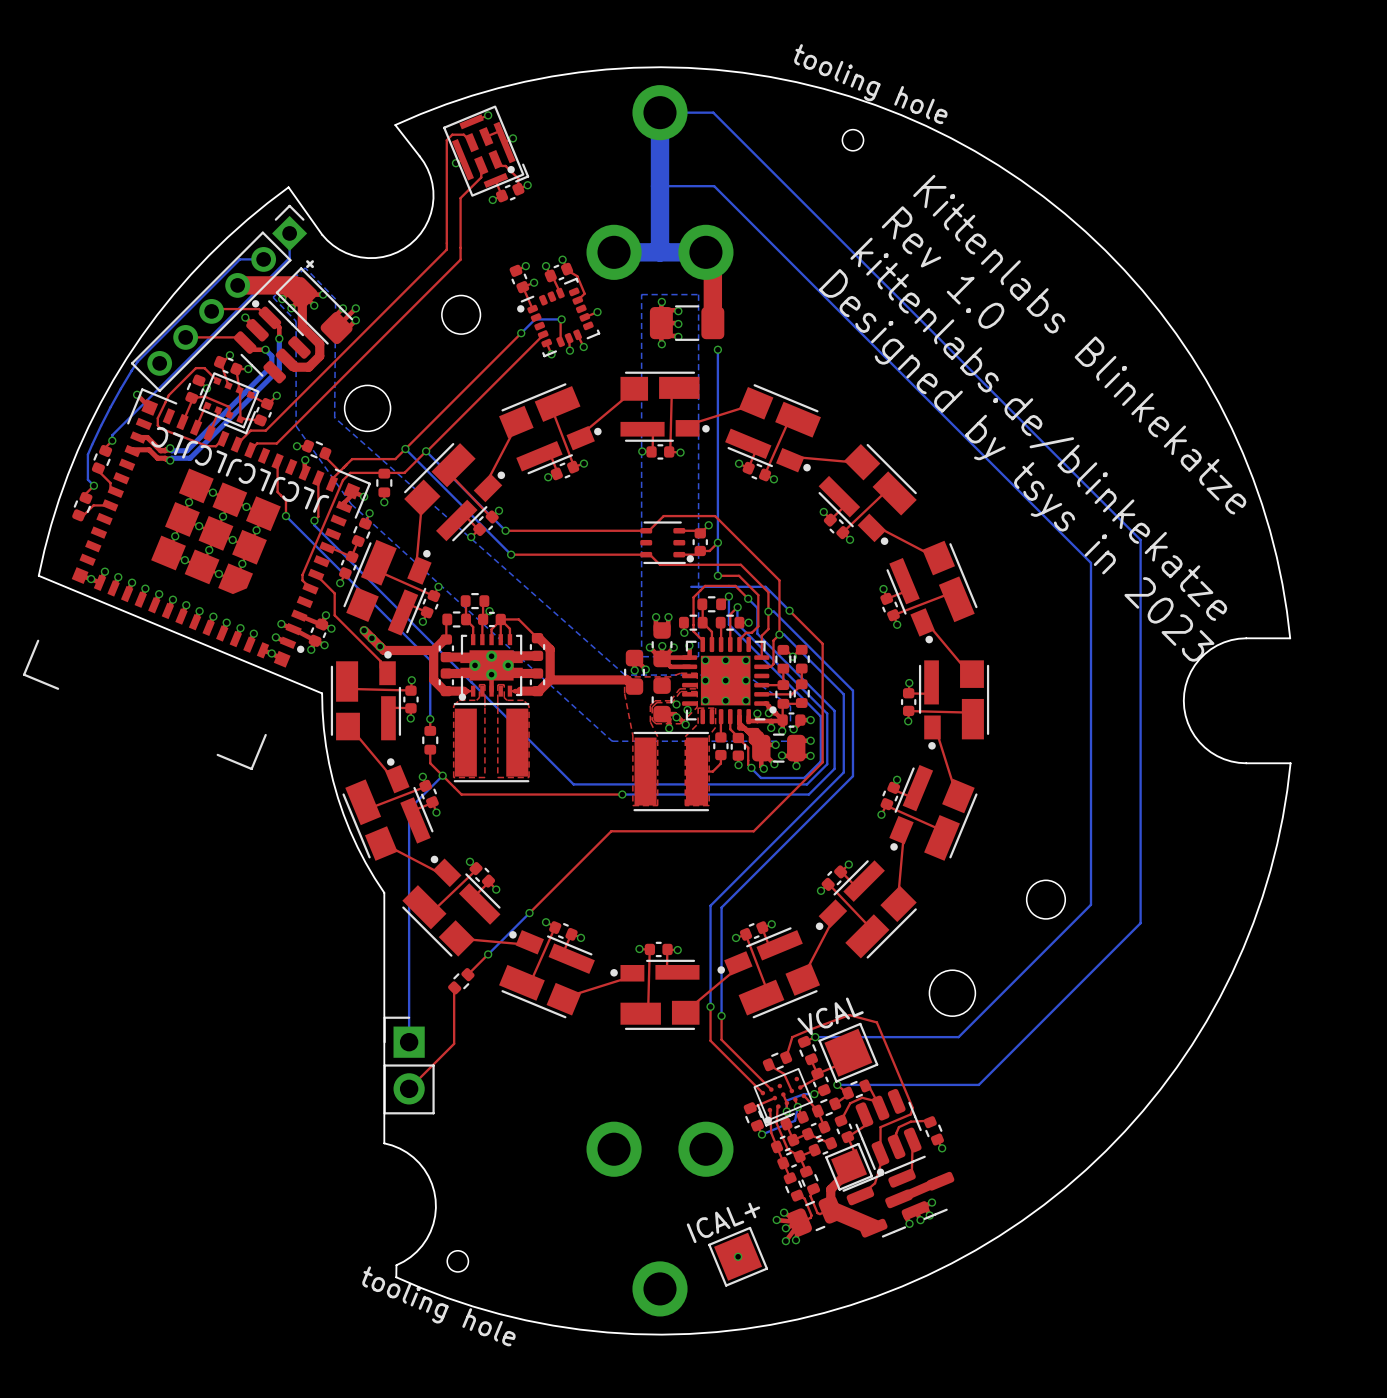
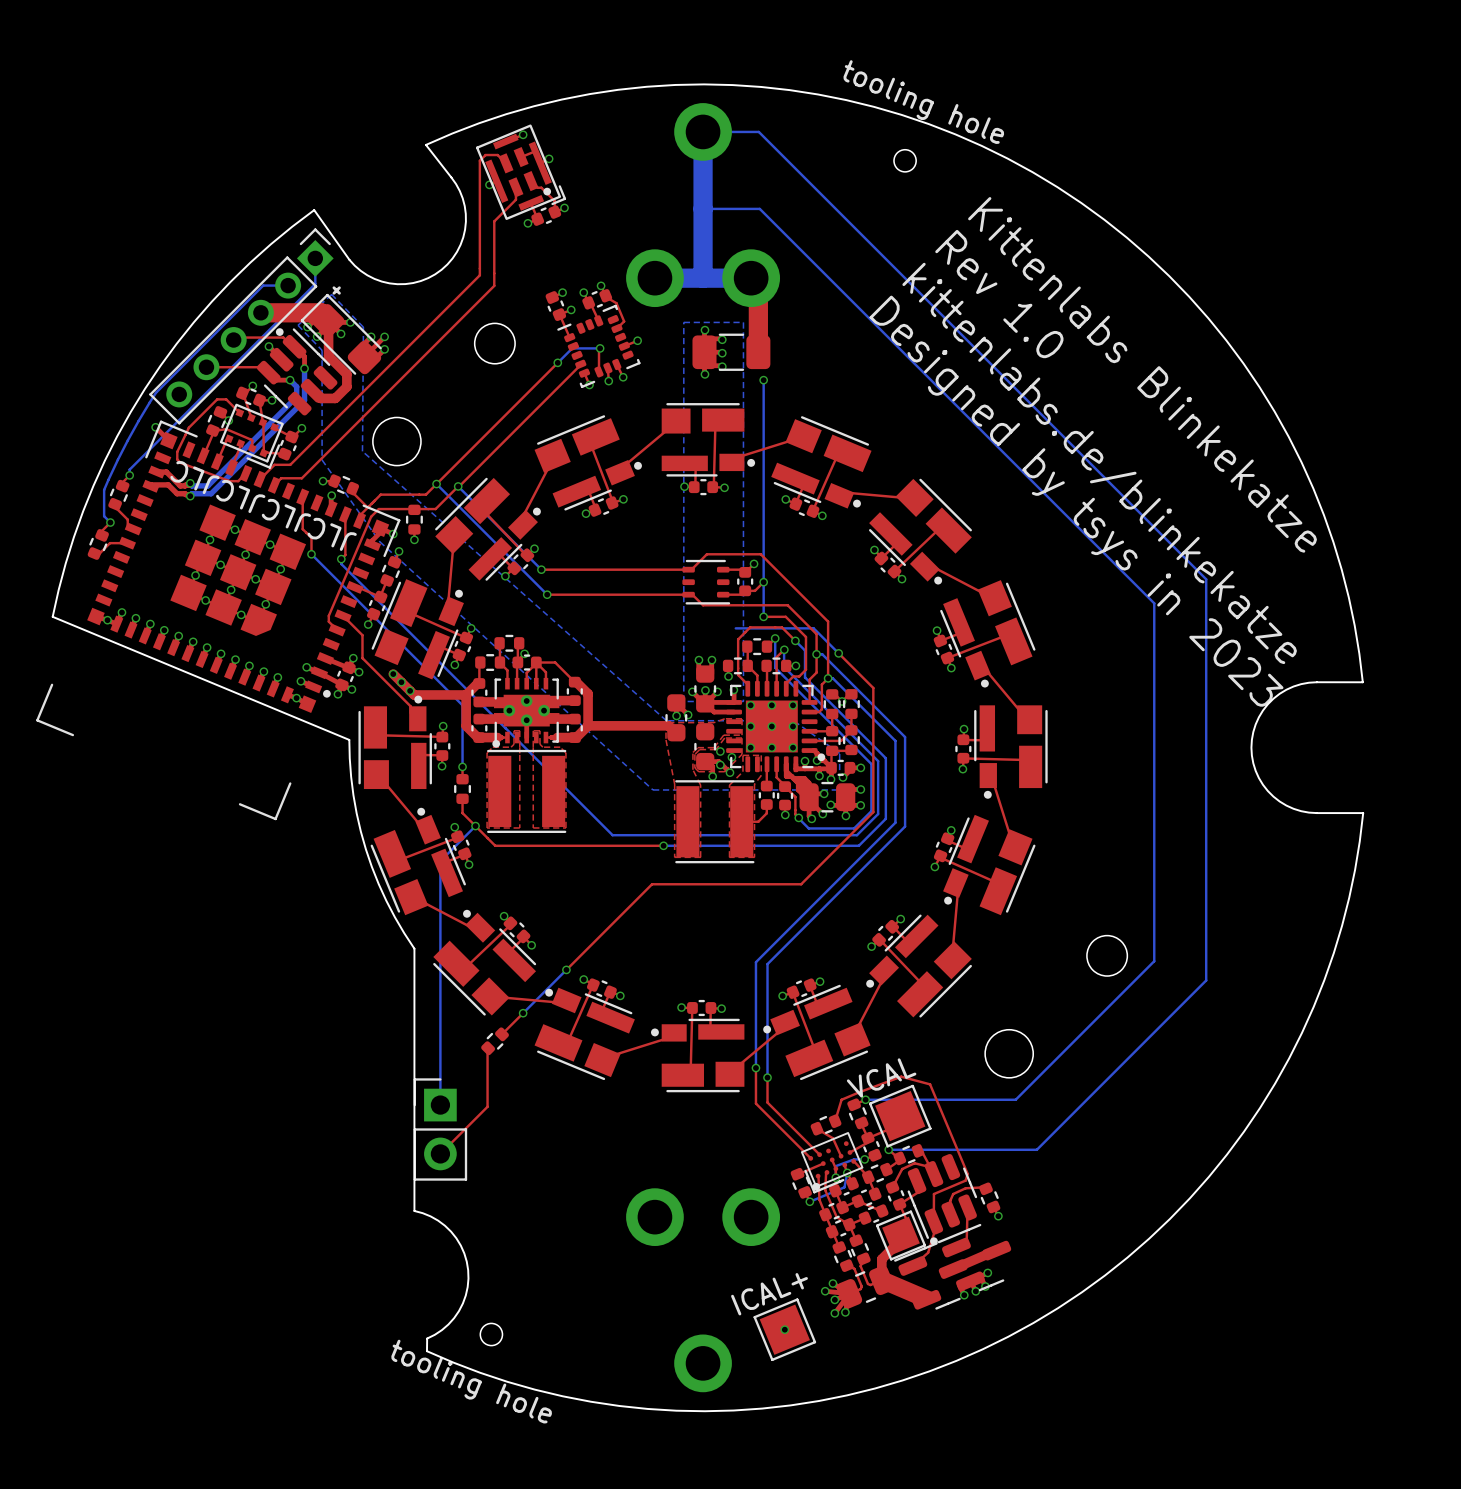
drawing: [517, 305, 525, 313] -> none
drawing: [686, 555, 695, 563] -> none

